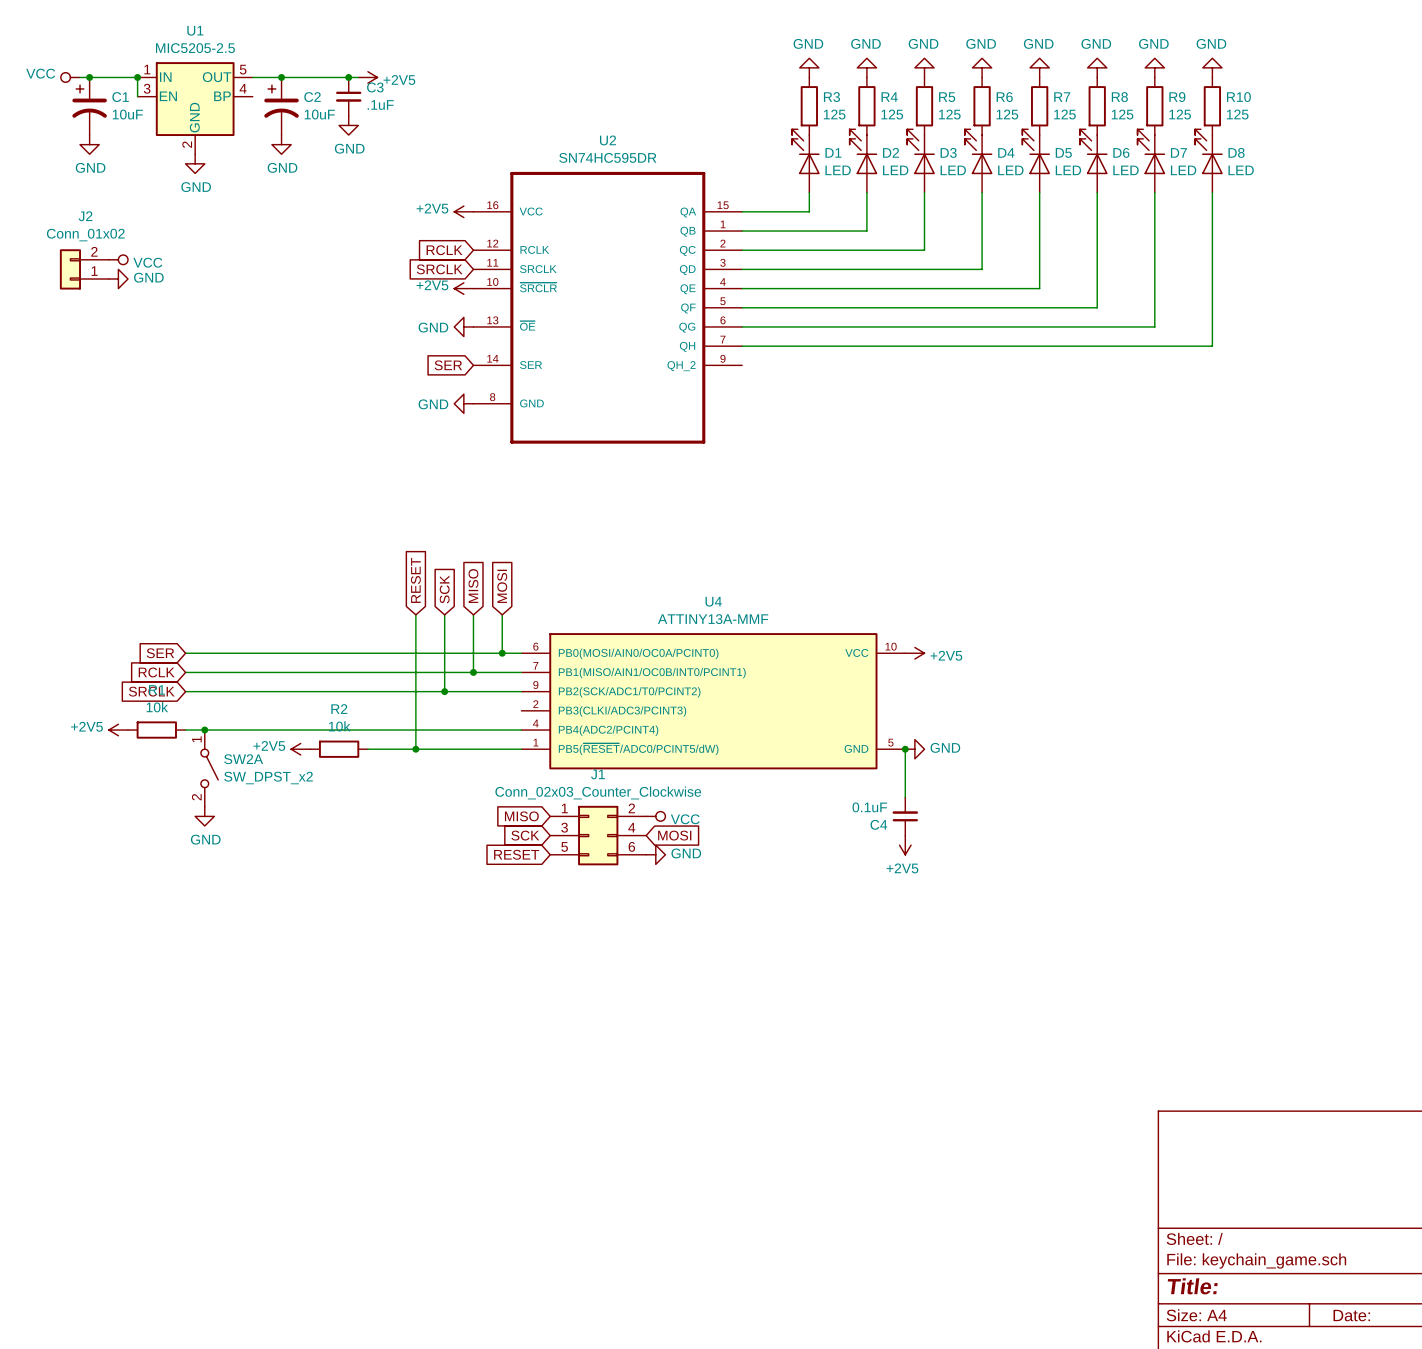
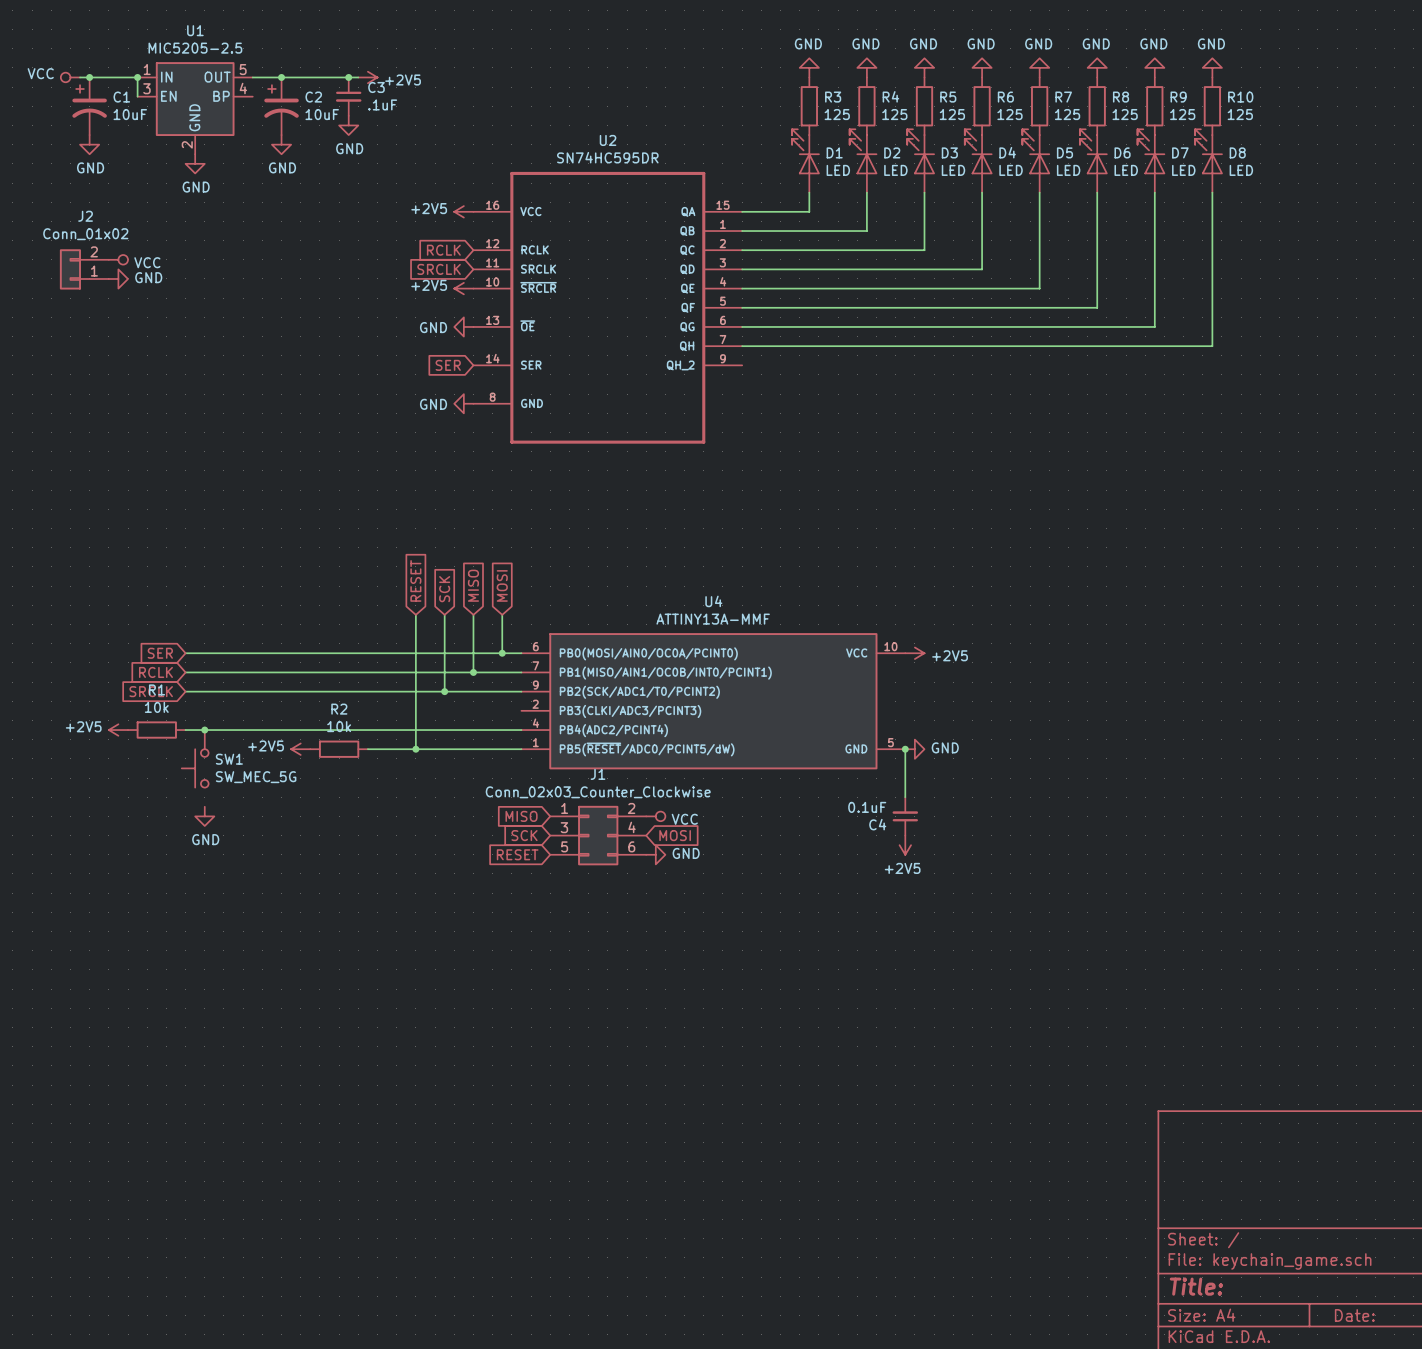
SW1: none -> SW_MEC_5G (195, 758)
SW2A: SW_DPST_x2 (209, 768) -> none

